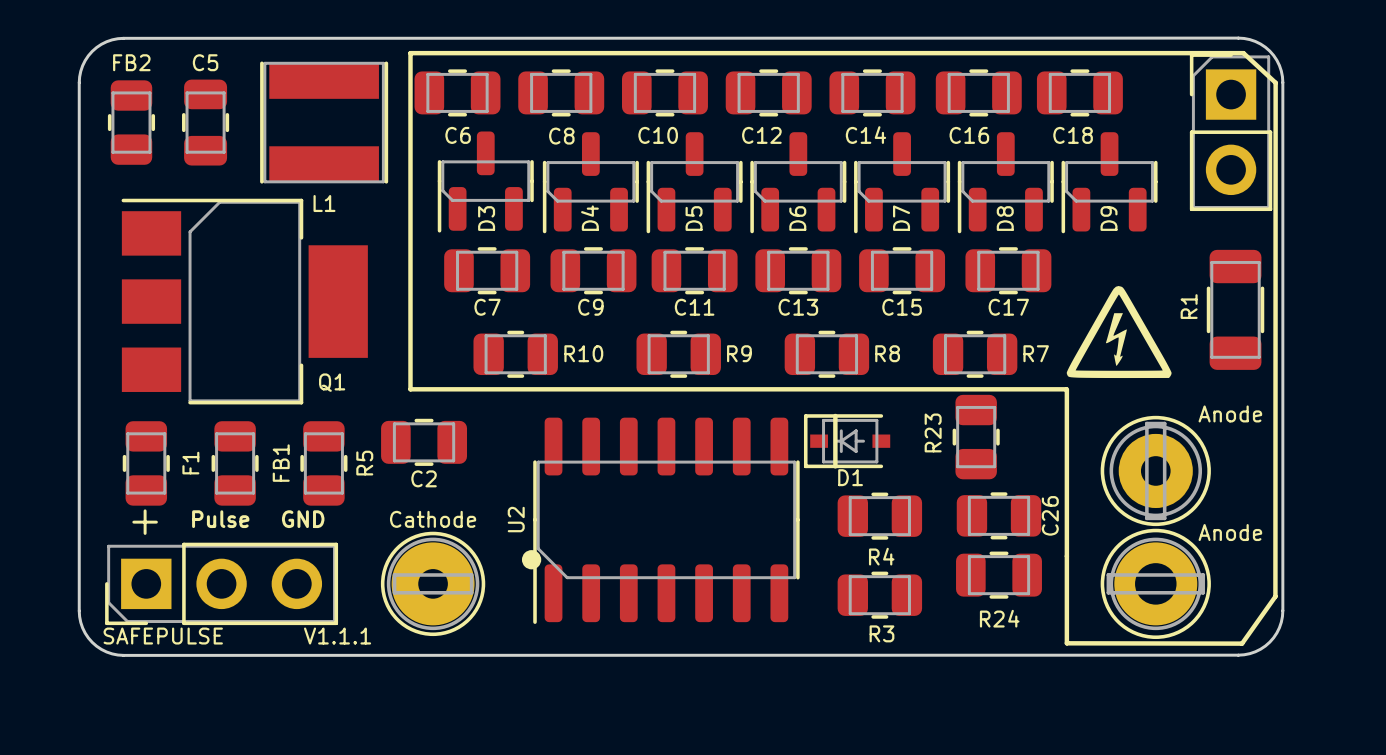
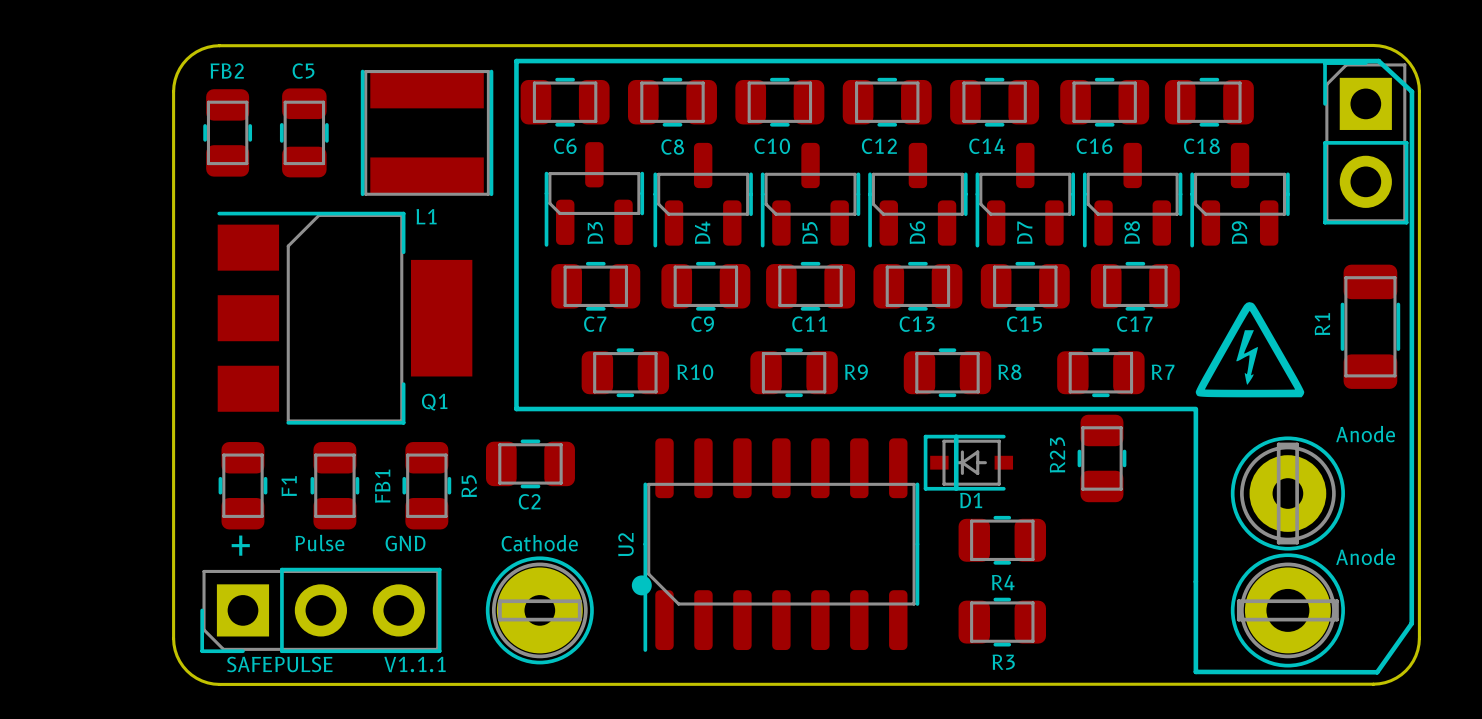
R24: (998, 515) -> none
C26: (998, 575) -> none

